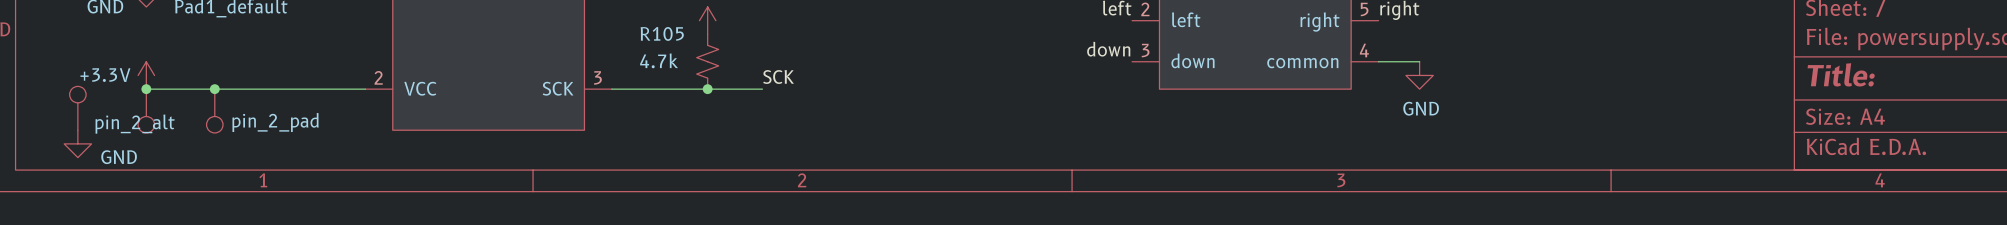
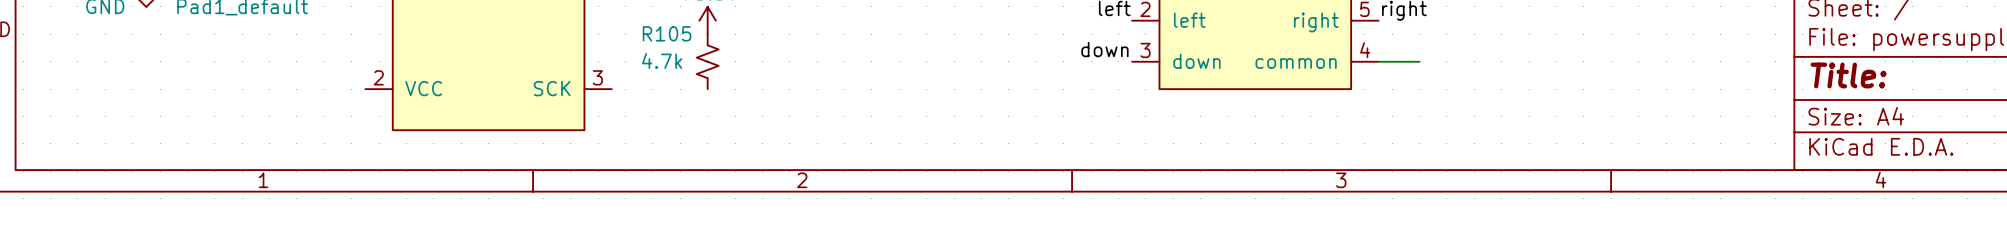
power symbol: +3.3V (146, 75) -> none
power symbol: GND (1419, 75) -> none
label: SCK (778, 77) -> none
wire: (146, 89) (365, 89) -> none
junction: (146, 89) -> none
junction: (214, 89) -> none
wire: (611, 89) (762, 89) -> none
junction: (707, 89) -> none
part: pin_2_alt (77, 108) -> none
part: (146, 111) -> none
part: pin_2_pad (214, 111) -> none
power symbol: GND (77, 143) -> none

